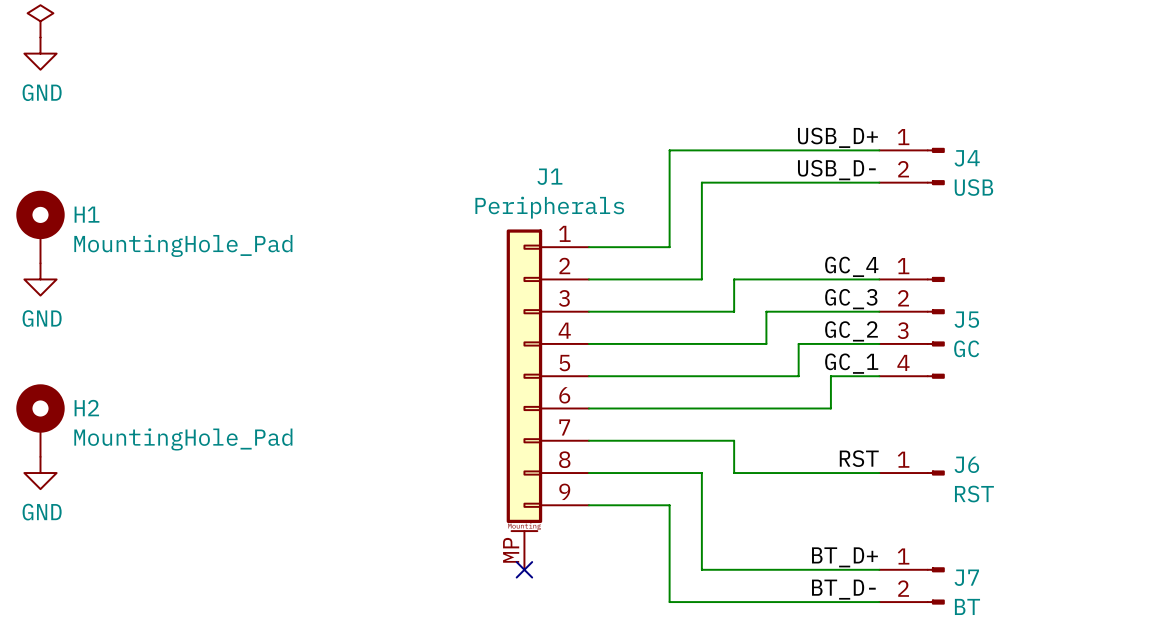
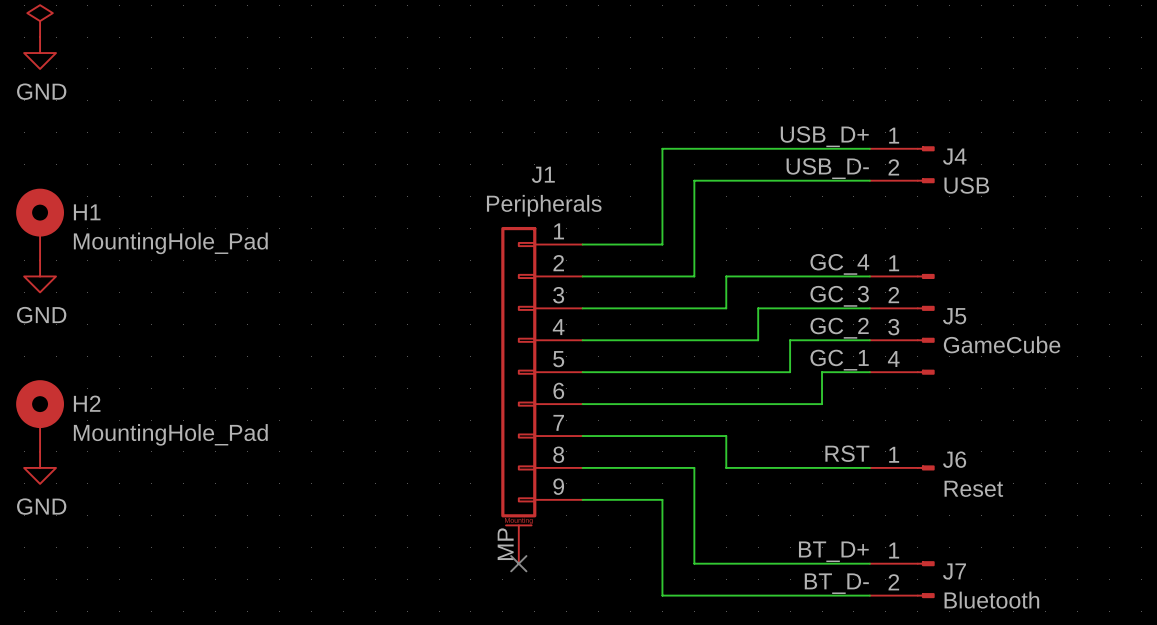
J5 value: GC (966, 348) -> GameCube (1002, 344)
J6 value: RST (974, 494) -> Reset (973, 488)
J7 value: BT (967, 606) -> Bluetooth (991, 600)

